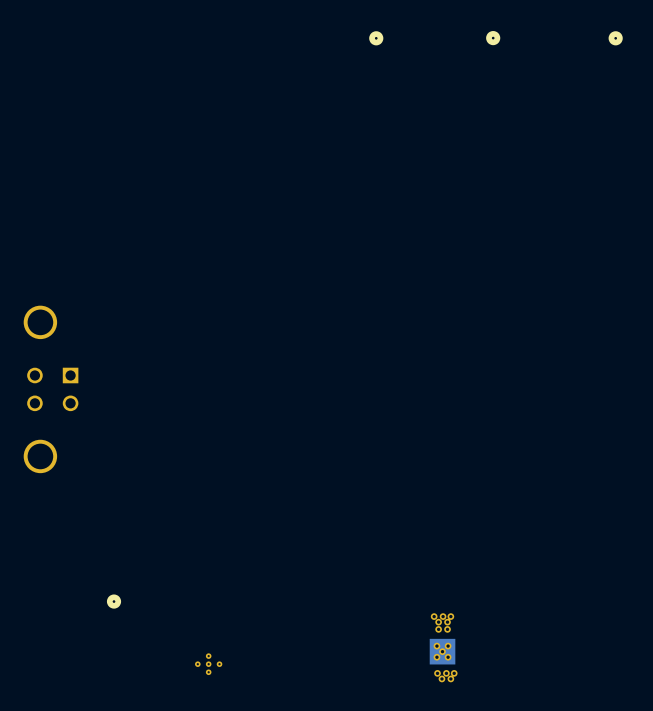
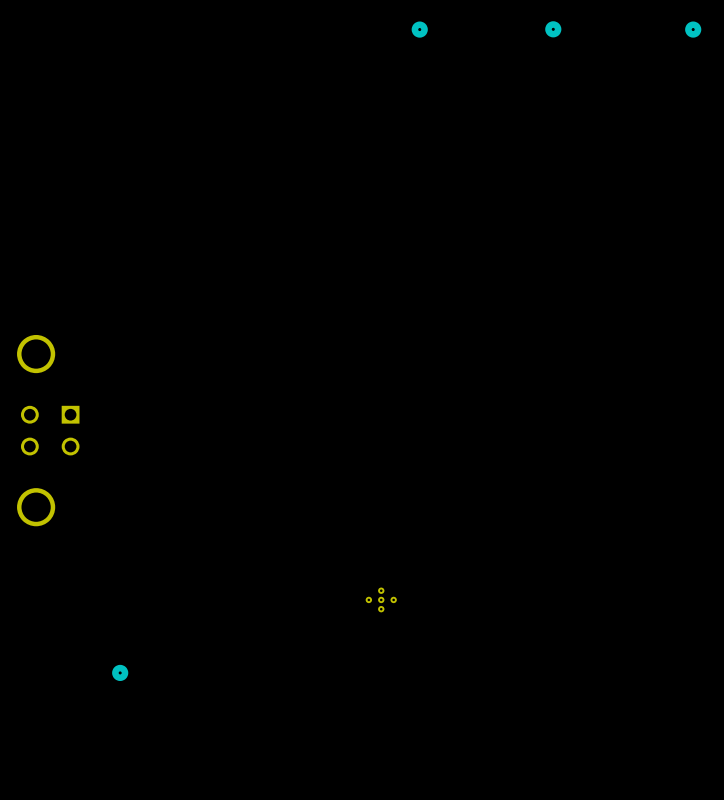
part: (434, 616) -> none
part: (443, 616) -> none
part: (450, 616) -> none
part: (438, 622) -> none
part: (447, 622) -> none
part: (438, 629) -> none
part: (447, 629) -> none
part: (442, 651) -> none
part position: (208, 664) -> (381, 599)
part: (437, 673) -> none
part: (446, 673) -> none
part: (454, 673) -> none
part: (441, 678) -> none
part: (450, 678) -> none

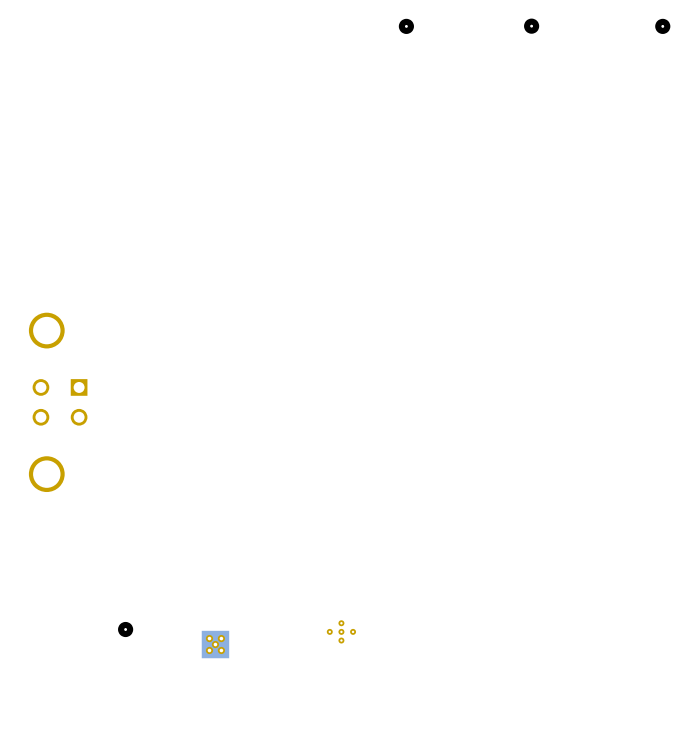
part position: (381, 599) -> (341, 631)
part: none -> (215, 644)

